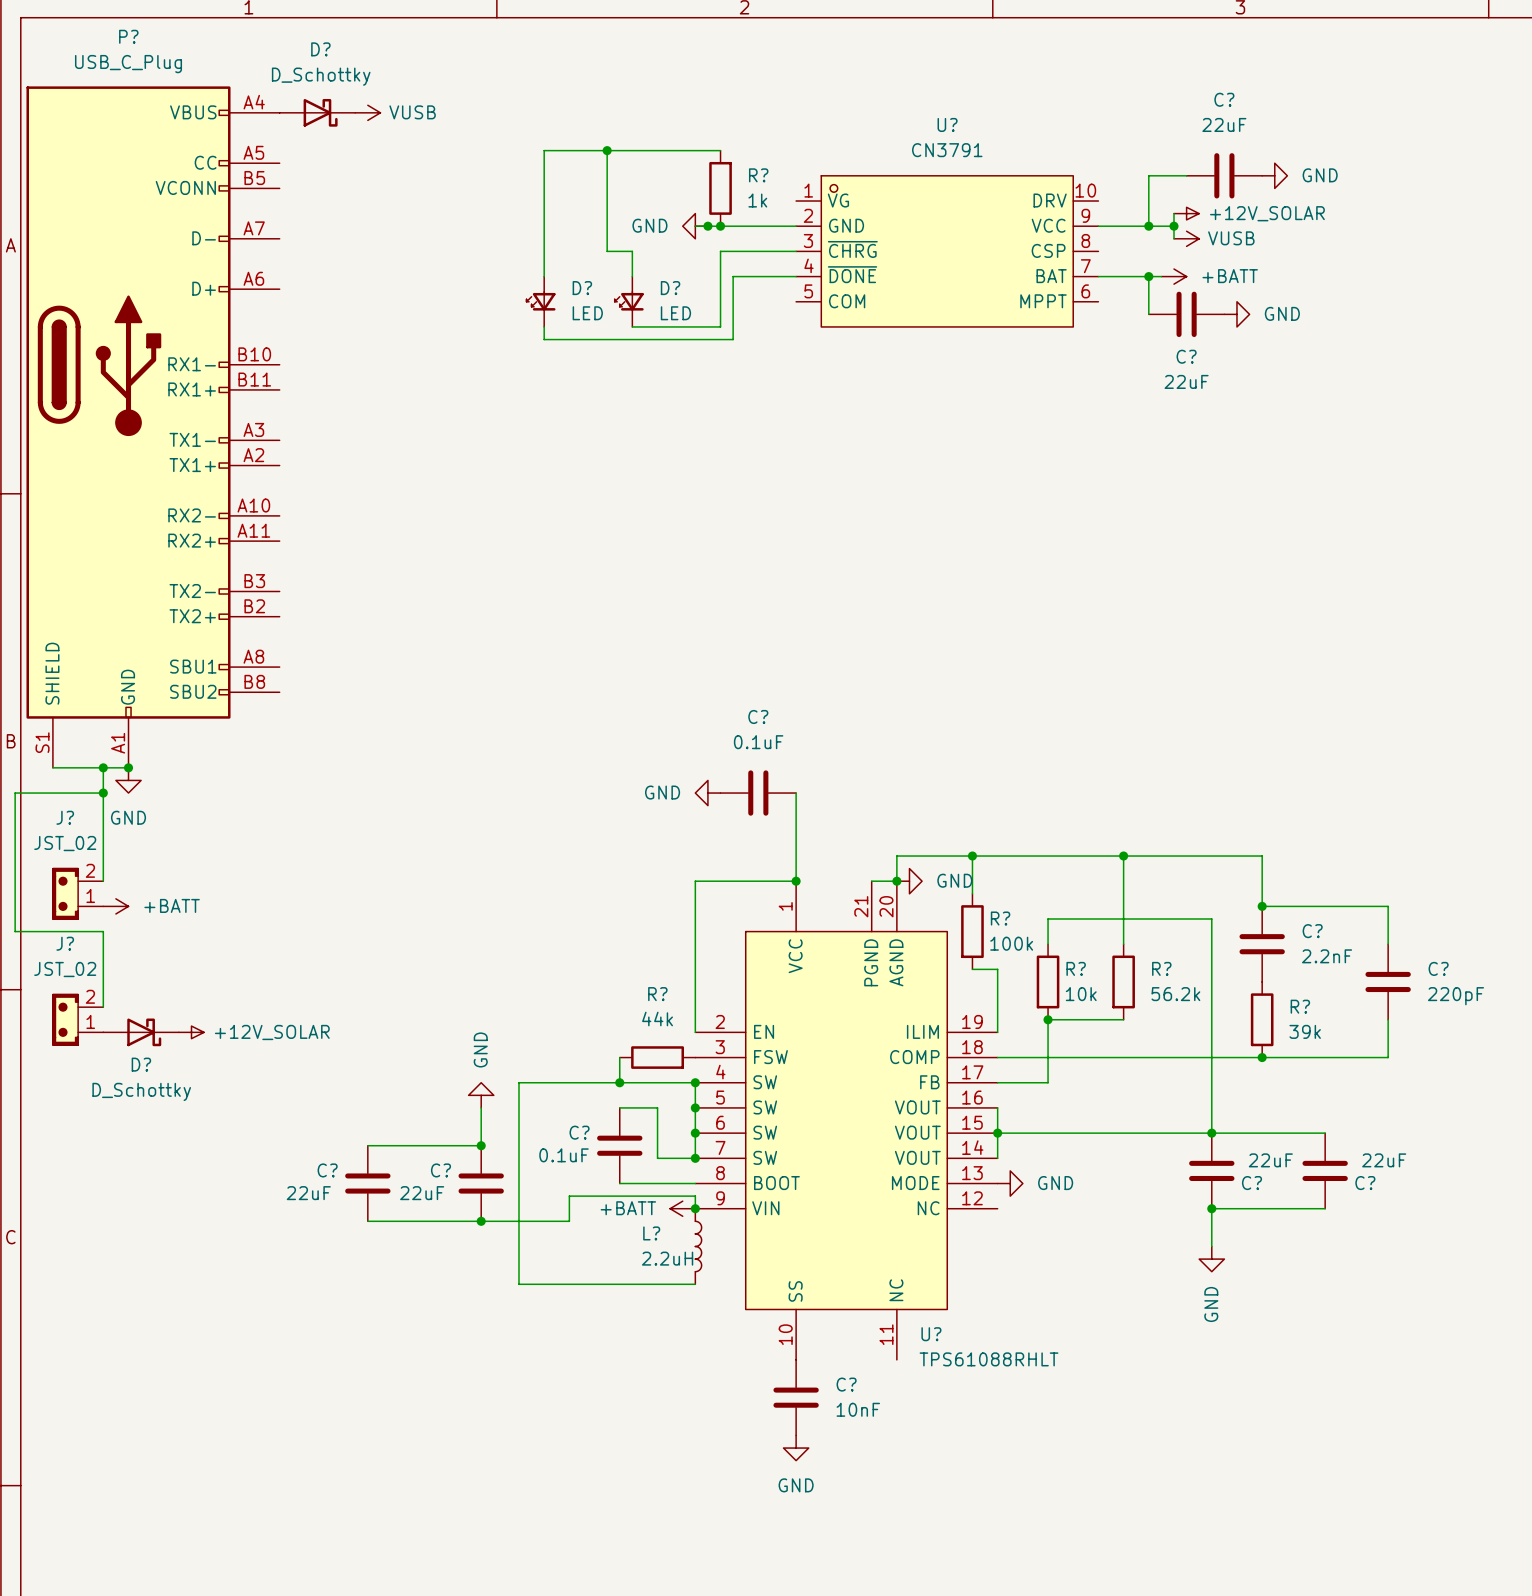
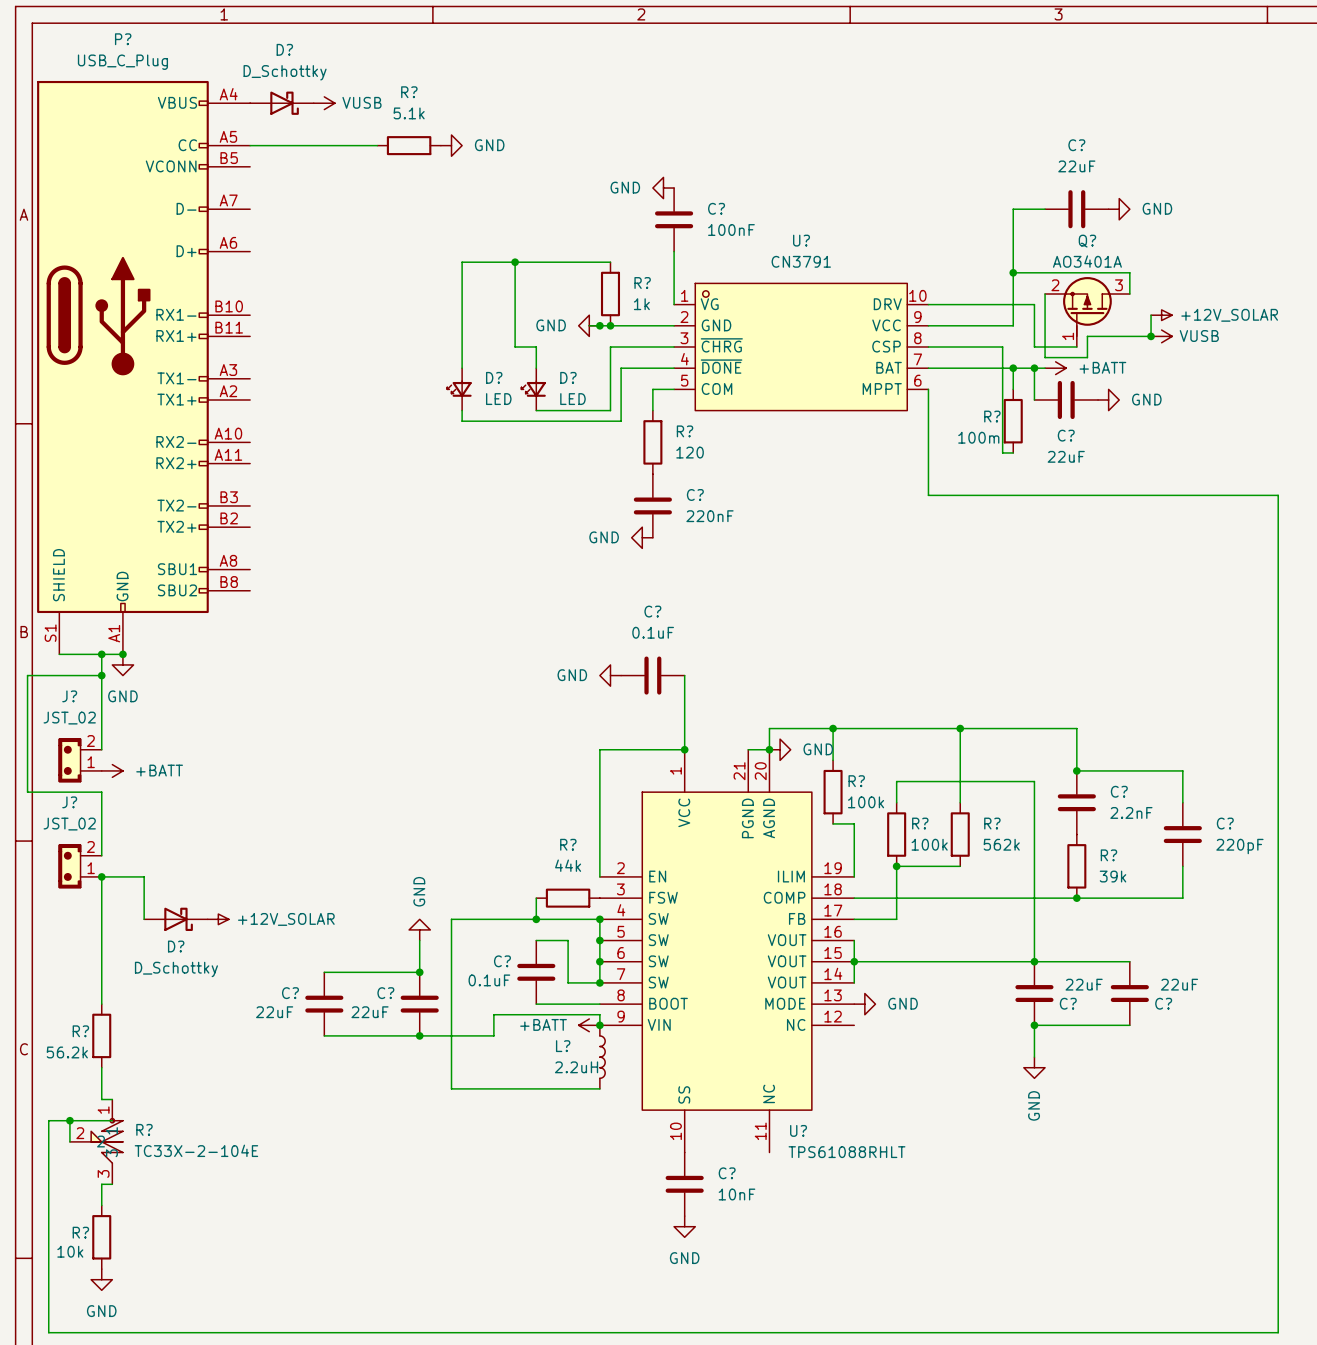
wire: (607, 150) (607, 251) (632, 251) (632, 276) -> (515, 262) (515, 346) (536, 346) (536, 368)
junction: (607, 150) -> none
wire: (720, 150) (544, 150) (544, 276) -> (610, 262) (462, 262) (462, 368)
wire: none -> (250, 145) (377, 145)
R?: none -> 5.1k (409, 145)
power symbol: none -> GND (451, 145)
wire: (1186, 175) (1148, 175) (1148, 226) -> none
C?: 22uF (1224, 175) -> none
power symbol: GND (1274, 175) -> none
R? position: (720, 188) -> (610, 294)
power symbol: none -> GND (663, 188)
wire: (1174, 213) (1174, 238) -> (1013, 368) (1013, 389)
power symbol position: +12V_SOLAR (1186, 213) -> +12V_SOLAR (1161, 315)
wire: (695, 226) (796, 226) -> (589, 325) (674, 325)
power symbol: GND (695, 226) -> none
junction: (707, 226) -> none
junction: (720, 226) -> none
wire: (1098, 226) (1174, 226) -> none
junction: (1148, 226) -> none
junction: (1174, 226) -> none
power symbol position: VUSB (1186, 238) -> VUSB (1161, 336)
wire: none -> (1045, 209) (1013, 209) (1013, 325) (928, 325)
C?: none -> 22uF (1076, 209)
power symbol: none -> GND (1119, 209)
C?: none -> 100nF (674, 219)
wire: (796, 251) (720, 251) (720, 326) (632, 326) -> (674, 346) (610, 346) (610, 410) (536, 410)
U? position: (947, 251) -> (801, 346)
wire: (796, 276) (733, 276) (733, 339) (544, 339) (544, 326) -> (674, 368) (621, 368) (621, 421) (462, 421) (462, 410)
wire: (1098, 276) (1161, 276) -> none
wire: (1148, 276) (1148, 314) -> (1034, 368) (1034, 399)
junction: (1148, 276) -> none
power symbol position: +BATT (1174, 276) -> +BATT (1055, 368)
wire: none -> (674, 251) (674, 304)
D?: LED (541, 301) -> none
junction: none -> (515, 262)
D?: LED (629, 301) -> none
wire: none -> (1013, 272) (1129, 272) (1129, 294)
junction: none -> (1013, 272)
C?: 22uF (1186, 314) -> none
power symbol: GND (1236, 314) -> none
wire: none -> (1045, 294) (1045, 357) (1087, 357) (1087, 336) (1151, 336) (1151, 315)
wire: none -> (928, 304) (1034, 304) (1034, 346) (1076, 346)
Q?: none -> AO3401A (1087, 312)
power symbol: none -> GND (589, 325)
junction: none -> (599, 325)
junction: none -> (610, 325)
junction: none -> (1151, 336)
wire: none -> (928, 346) (1002, 346) (1002, 452) (1013, 452)
wire: none -> (928, 368) (1045, 368)
junction: none -> (1013, 368)
junction: none -> (1034, 368)
D?: none -> LED (459, 389)
D?: none -> LED (533, 389)
wire: none -> (674, 389) (652, 389) (652, 410)
wire: none -> (928, 389) (928, 495) (1278, 495) (1278, 1332) (48, 1332) (48, 1120) (112, 1120)
C?: none -> 22uF (1066, 399)
power symbol: none -> GND (1108, 399)
R?: none -> 100m (1013, 421)
R?: none -> 120 (652, 442)
C?: none -> 220nF (652, 505)
power symbol: none -> GND (642, 537)
R? value: 10k (1081, 994) -> 100k (929, 844)
R? value: 56.2k (1175, 994) -> 562k (1001, 844)
junction: none -> (101, 876)
D? position: (141, 1032) -> (175, 919)
power symbol position: +12V_SOLAR (191, 1032) -> +12V_SOLAR (218, 919)
wire: none -> (144, 919) (144, 876) (101, 876) (101, 1004)
R?: none -> 56.2k (101, 1035)
wire: none -> (101, 1067) (101, 1099) (112, 1099)
wire: none -> (69, 1120) (69, 1141)
junction: none -> (69, 1120)
R?: none -> TC33X-2-104E (96, 1141)
wire: none -> (112, 1184) (101, 1184) (101, 1205)
R?: none -> 10k (101, 1237)
power symbol: none -> GND (101, 1279)

